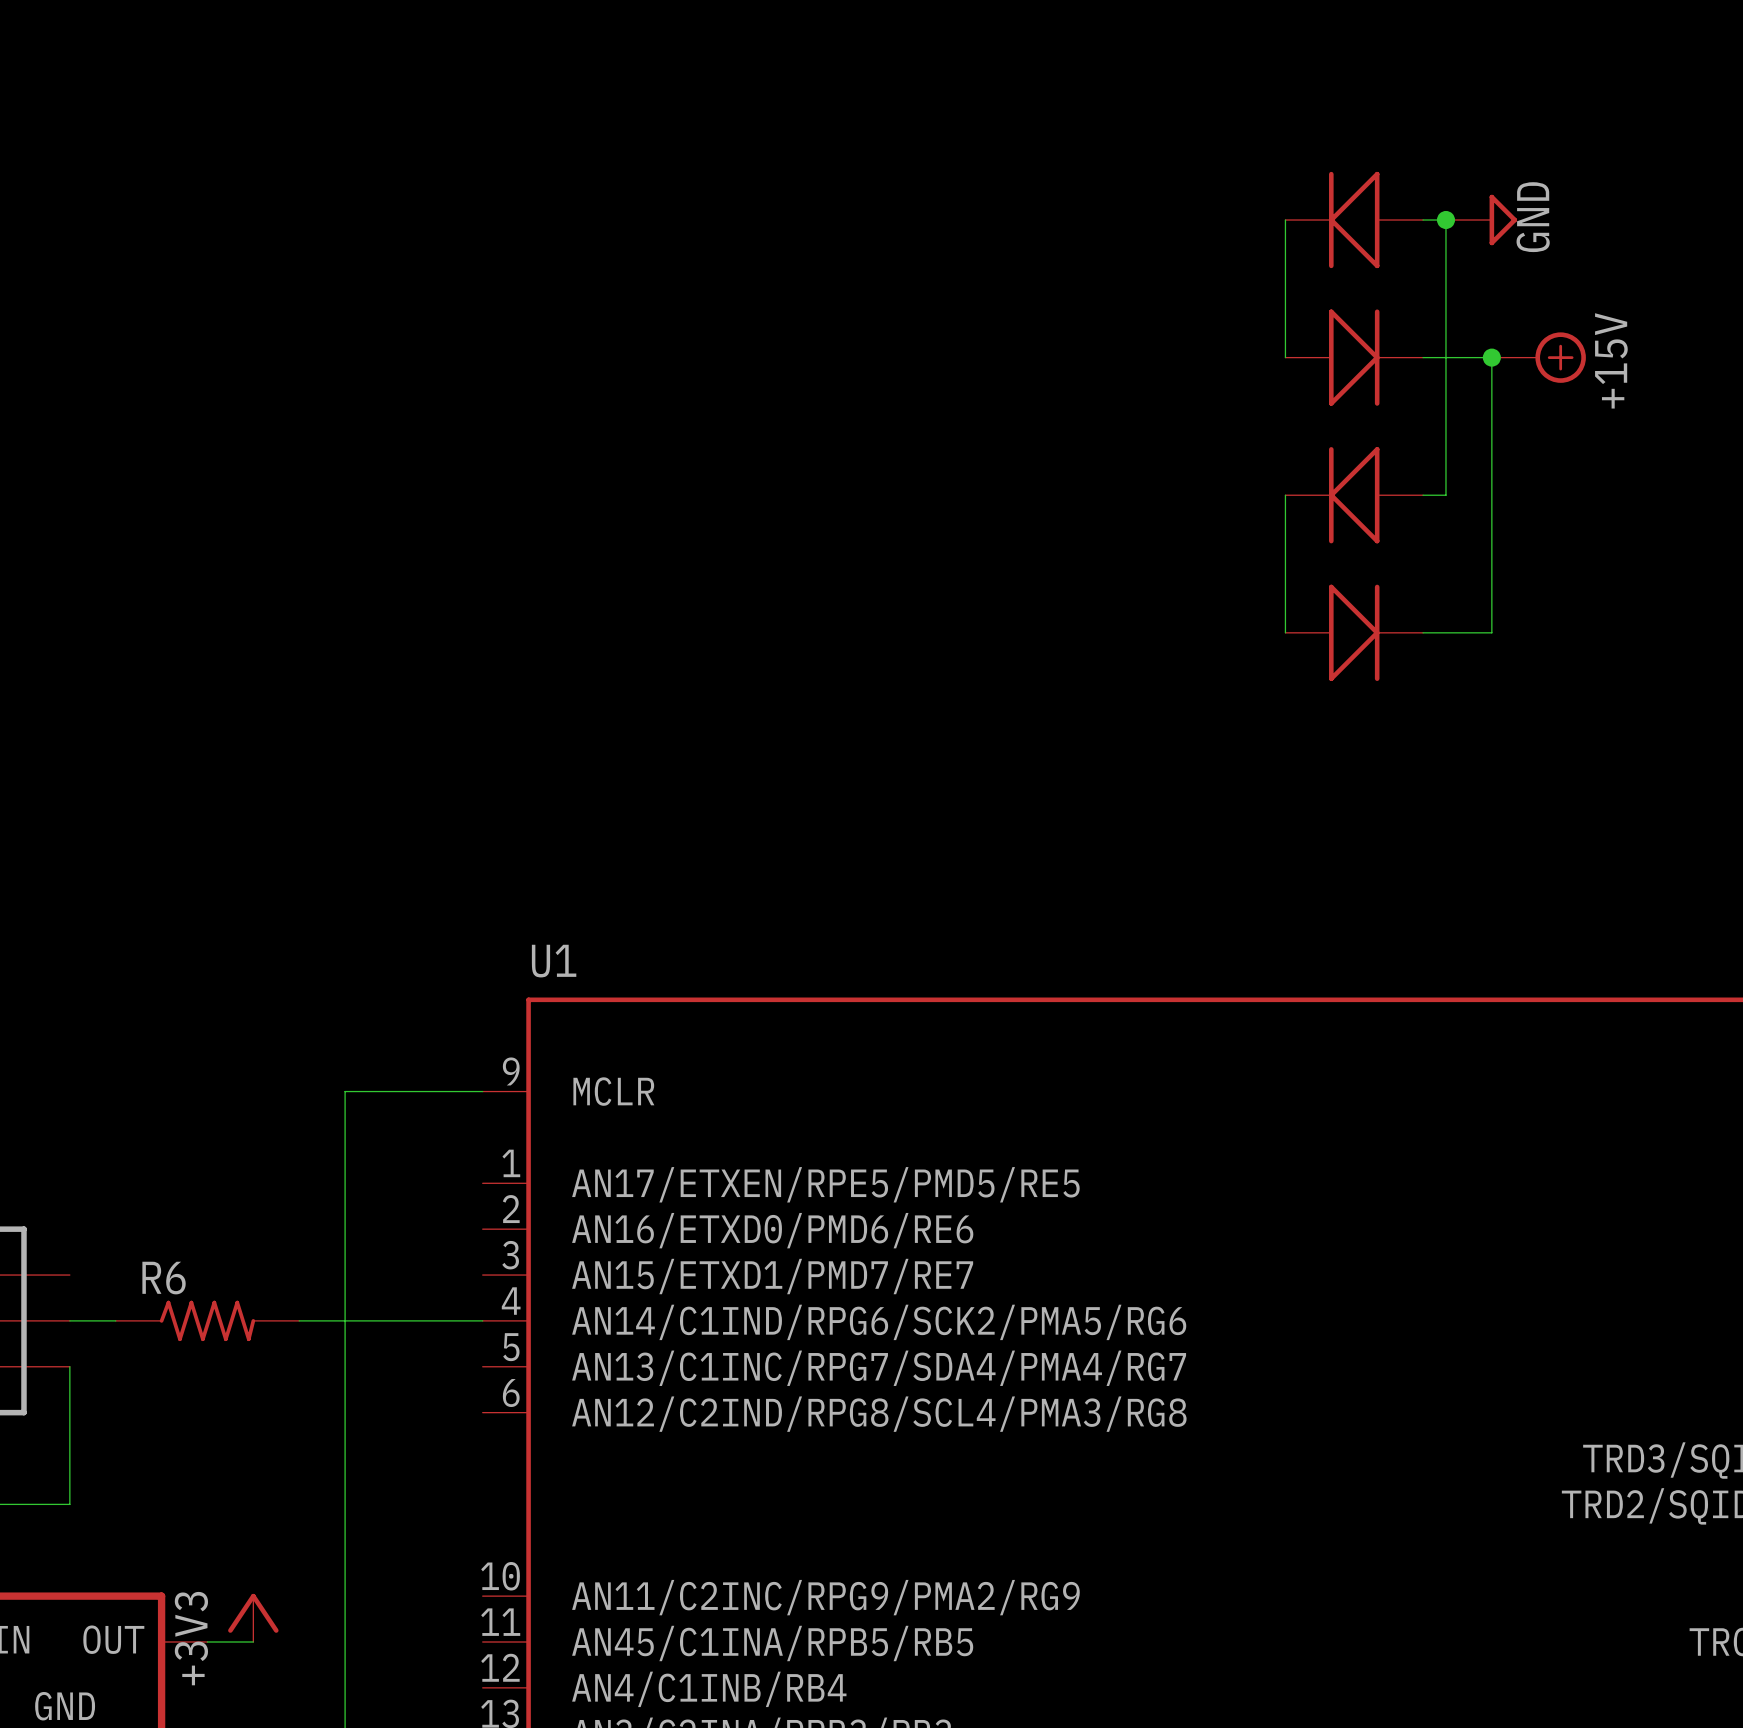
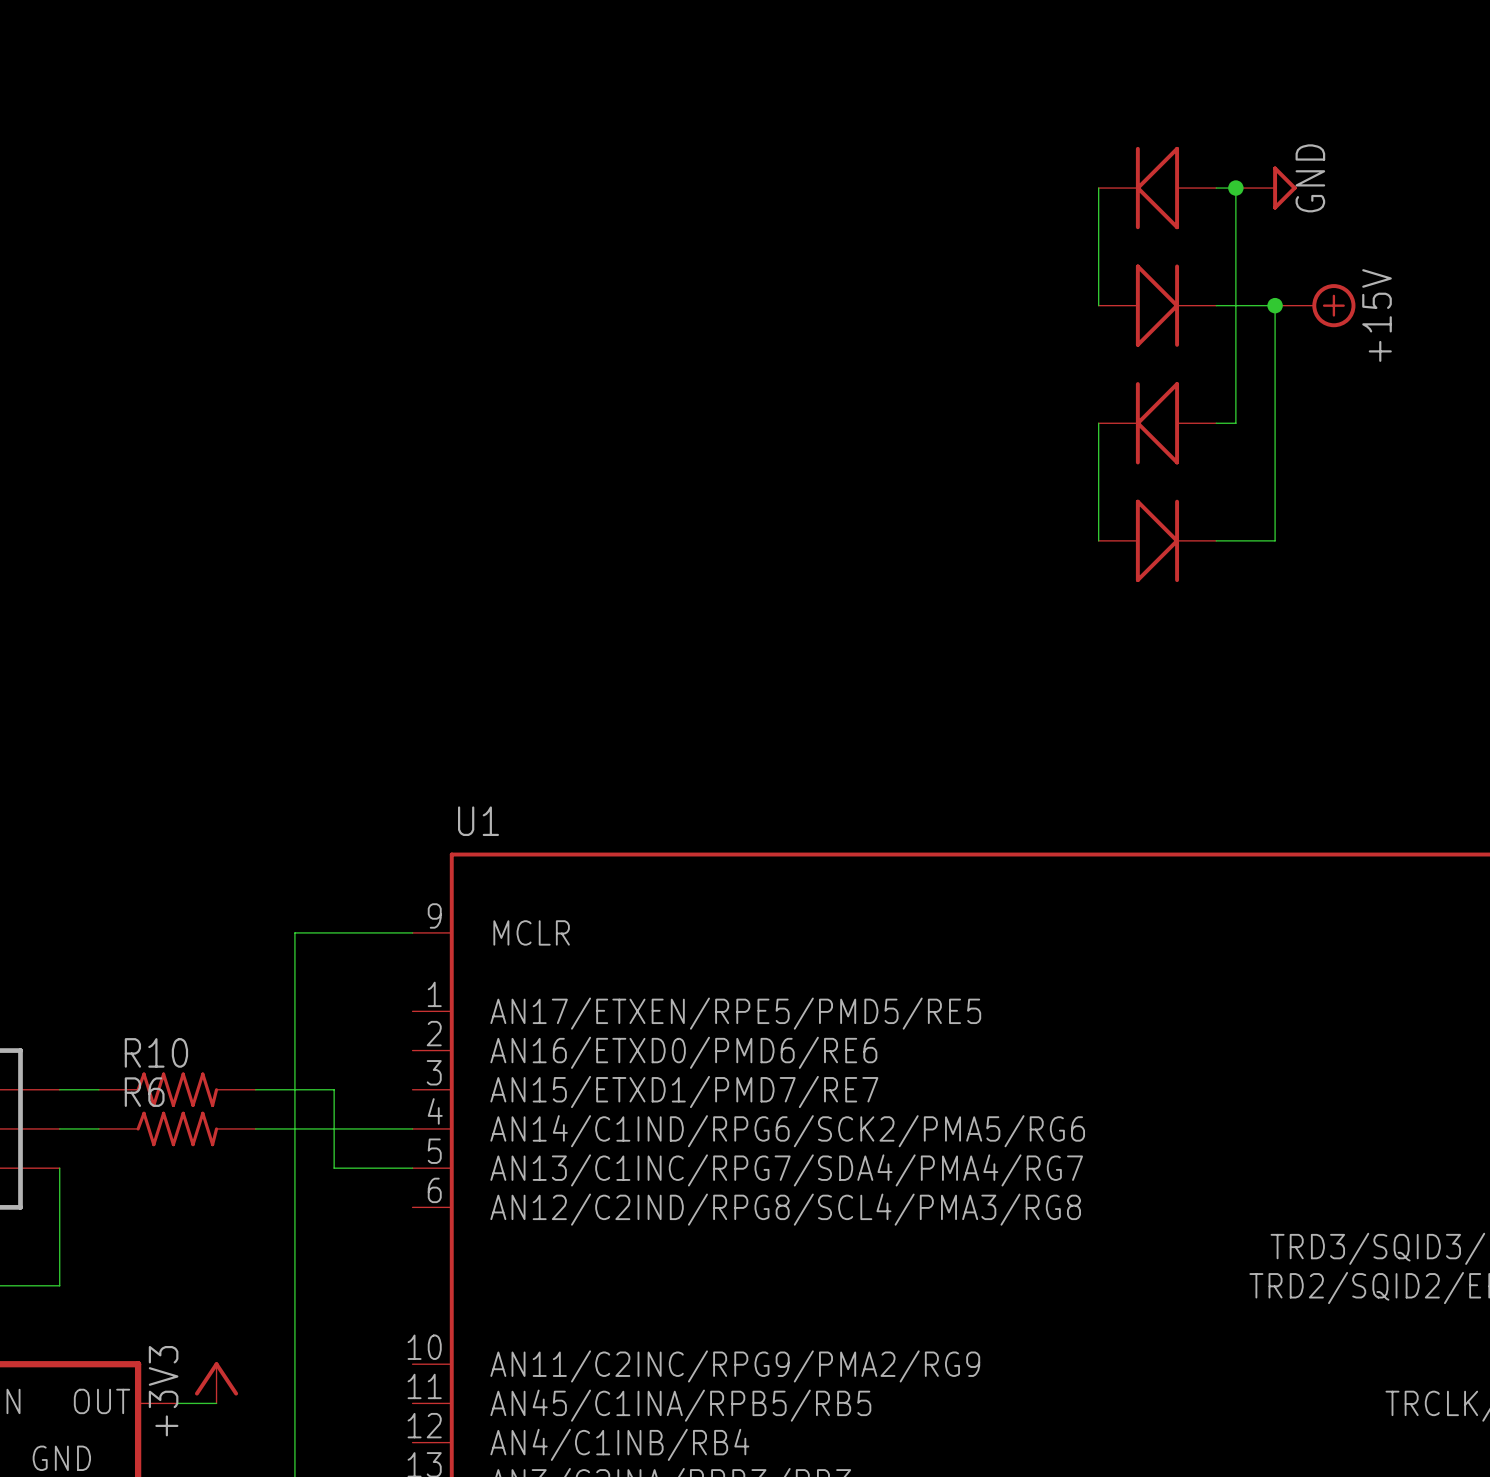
wire: none -> (59, 1089) (98, 1089)
R10: none -> (177, 1089)
wire: none -> (255, 1089) (334, 1089) (334, 1168) (412, 1168)

